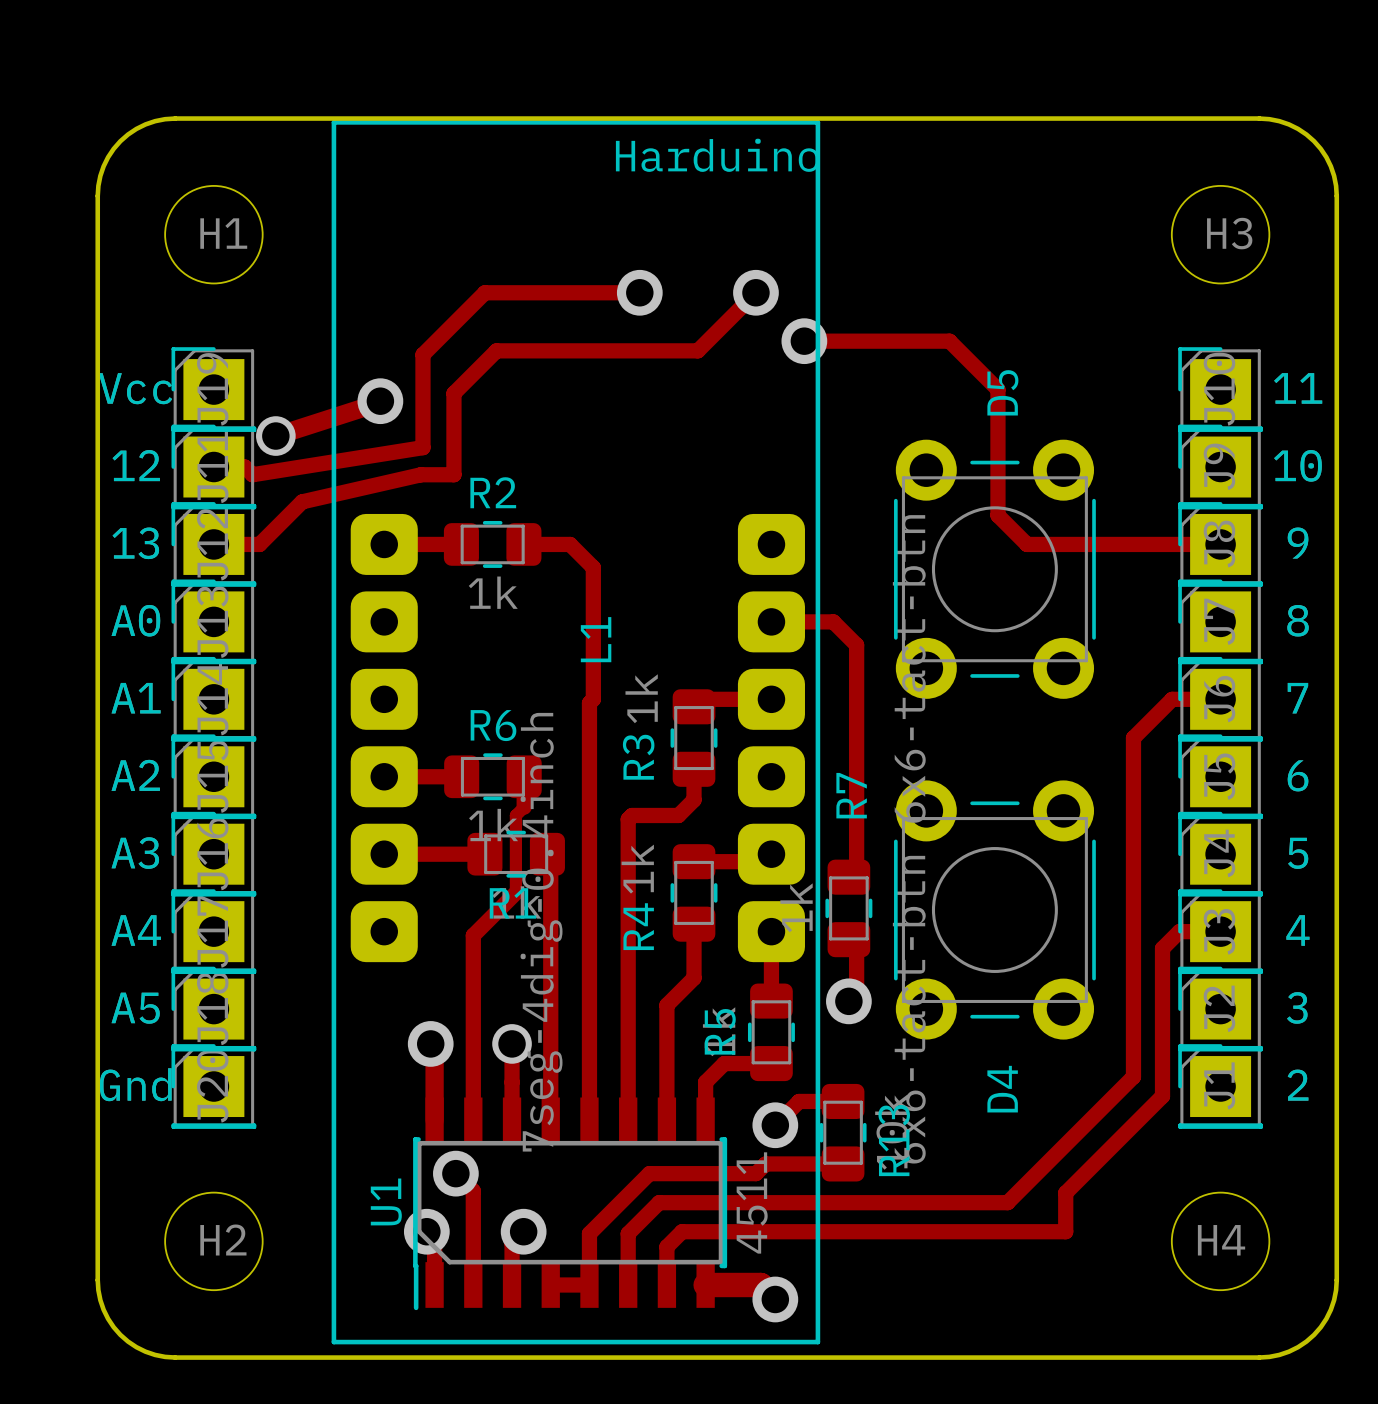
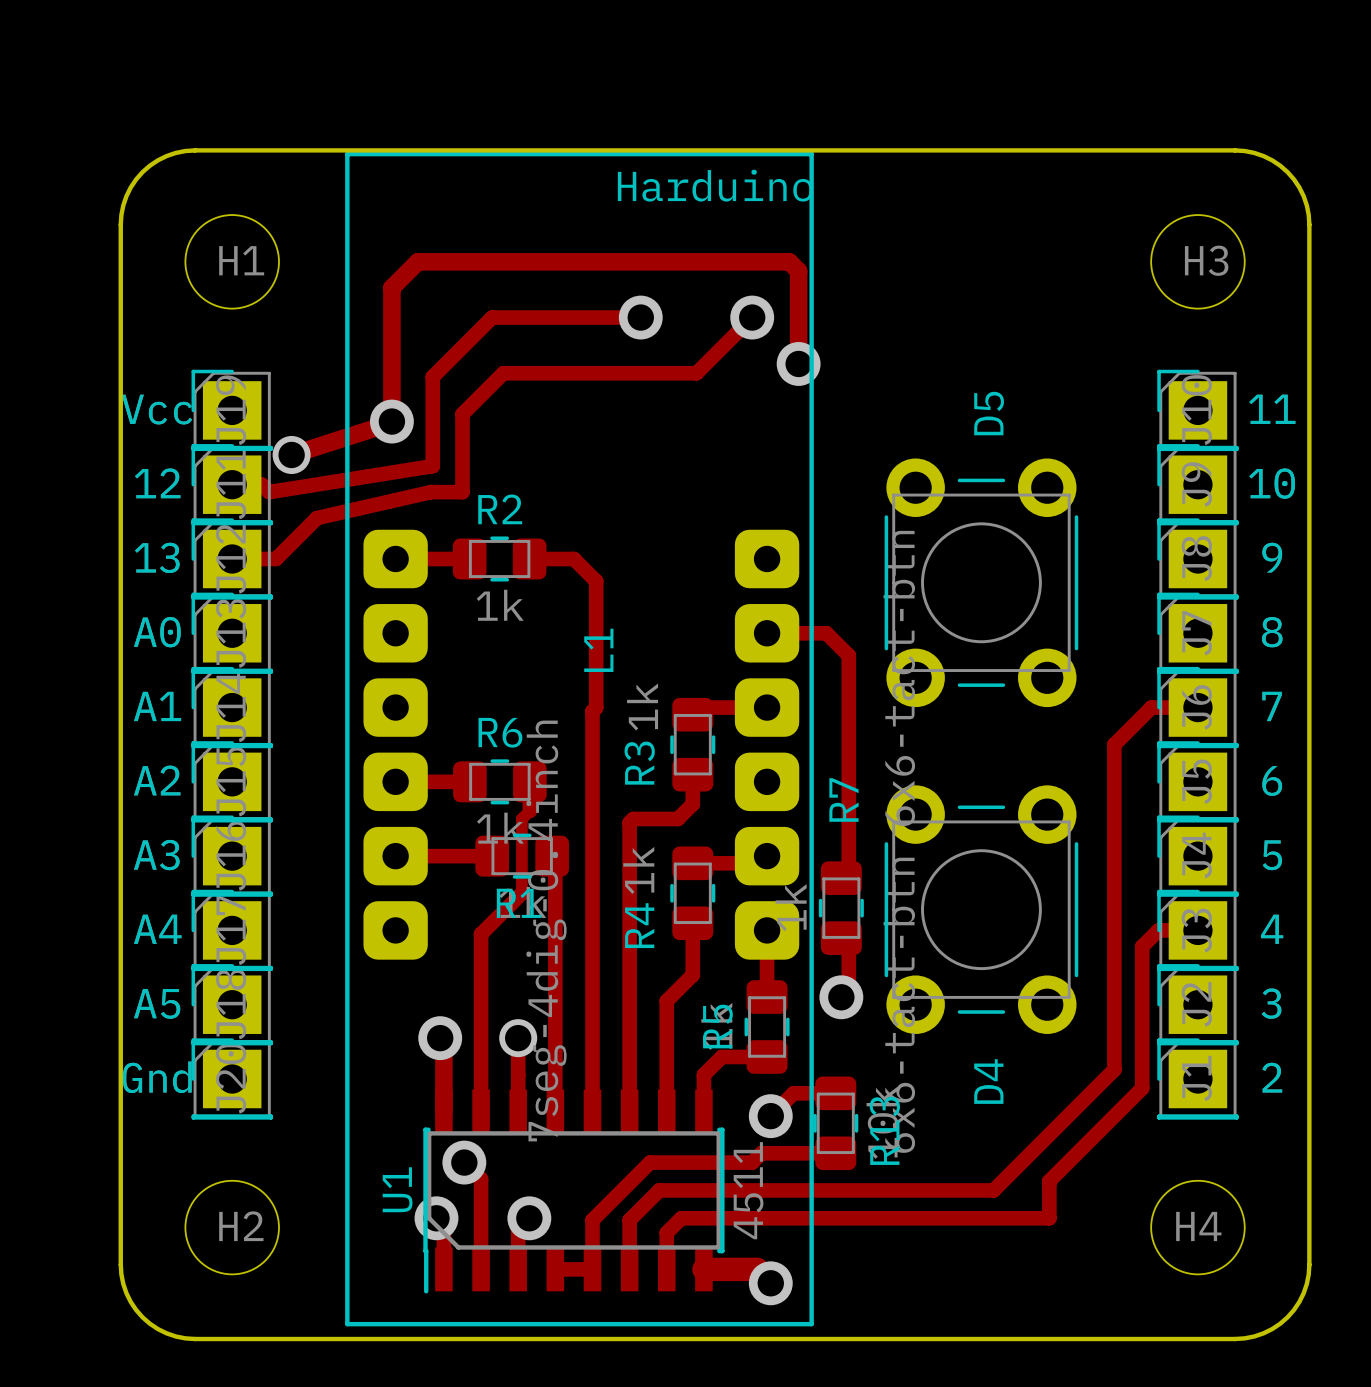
track: (804, 341) (949, 341) (997, 389) (997, 515) (1027, 544) (1220, 544) -> (798, 363) (798, 271) (789, 261) (417, 261) (391, 287) (391, 421)

